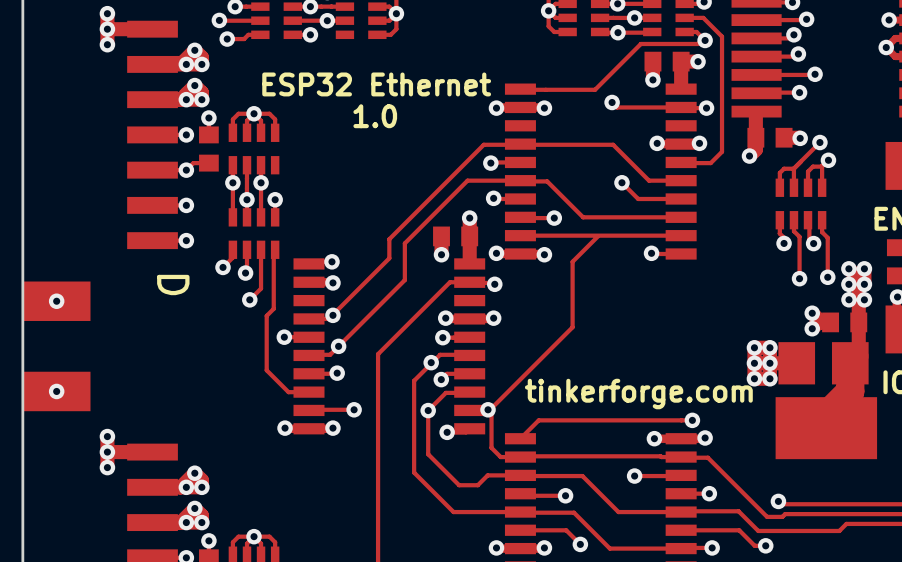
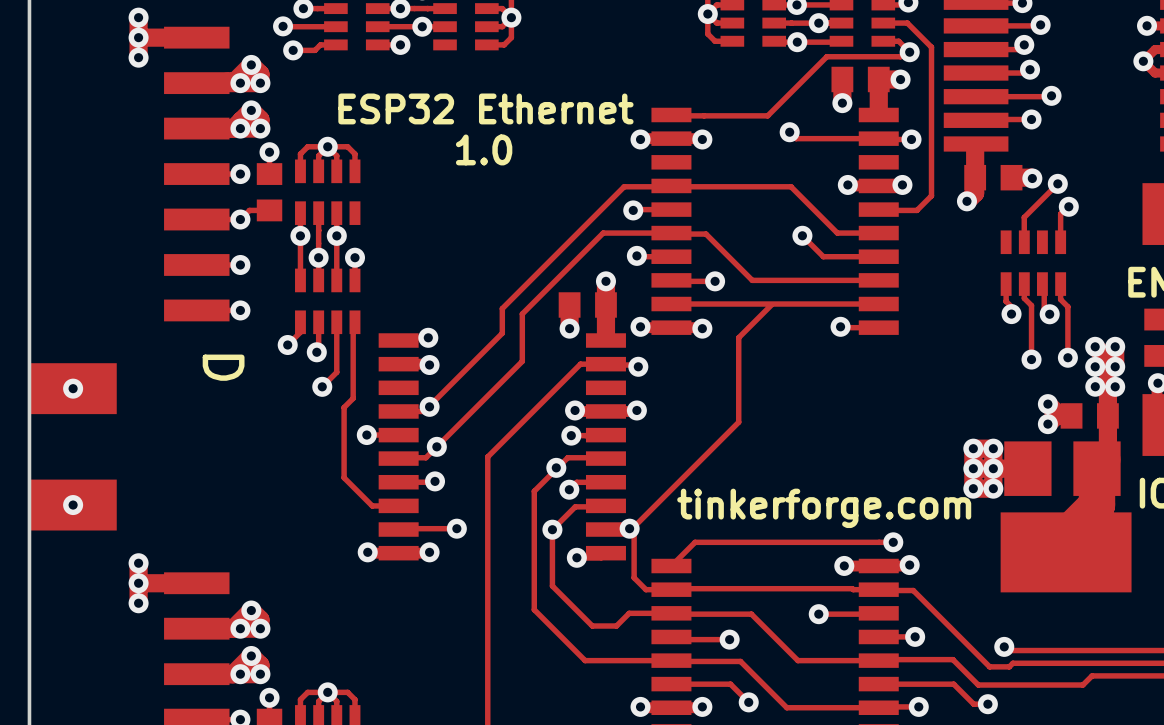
track: (800, 161) (793, 168) (784, 168) (779, 172) (779, 187) -> none
track: (822, 166) (812, 166) (808, 171) (808, 187) -> none

